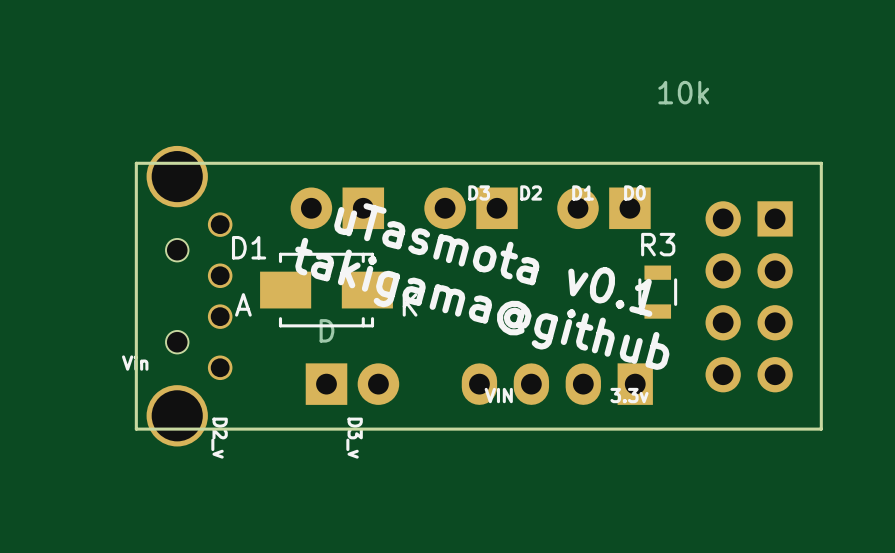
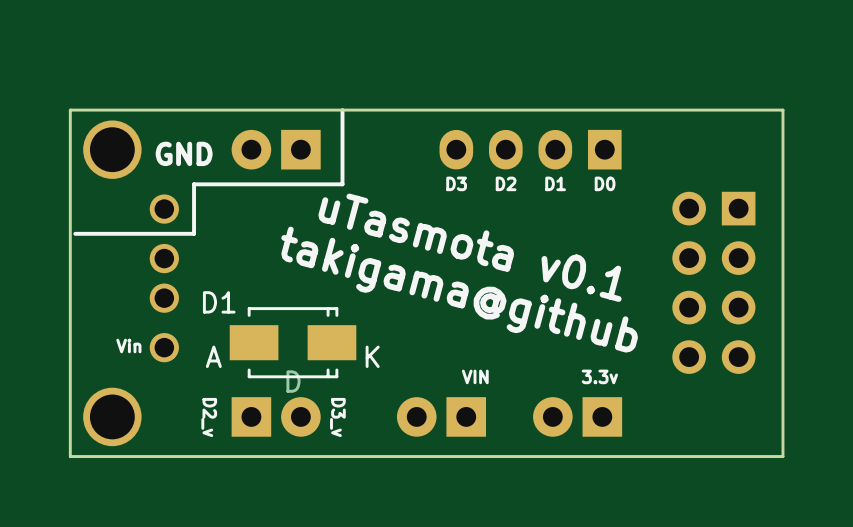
line: none -> (342, 110) (342, 184) (194, 184) (194, 233) (75, 233)
text: none -> GND (184, 153)
board edge: (821, 163) (821, 429) (136, 429) (136, 163) (821, 163) -> (782, 110) (782, 456) (70, 456) (70, 110) (782, 110)
part position: (337, 208) -> (276, 149)
part: (471, 208) -> none
part: (603, 208) -> none
D1 position: (326, 290) -> (293, 342)
R3: 10k (657, 292) -> none
part: (189, 296) -> none
part: none -> (131, 283)
part: (352, 384) -> none
part position: (557, 384) -> (530, 149)
part: none -> (276, 416)
part: none -> (441, 416)
part: none -> (577, 416)

